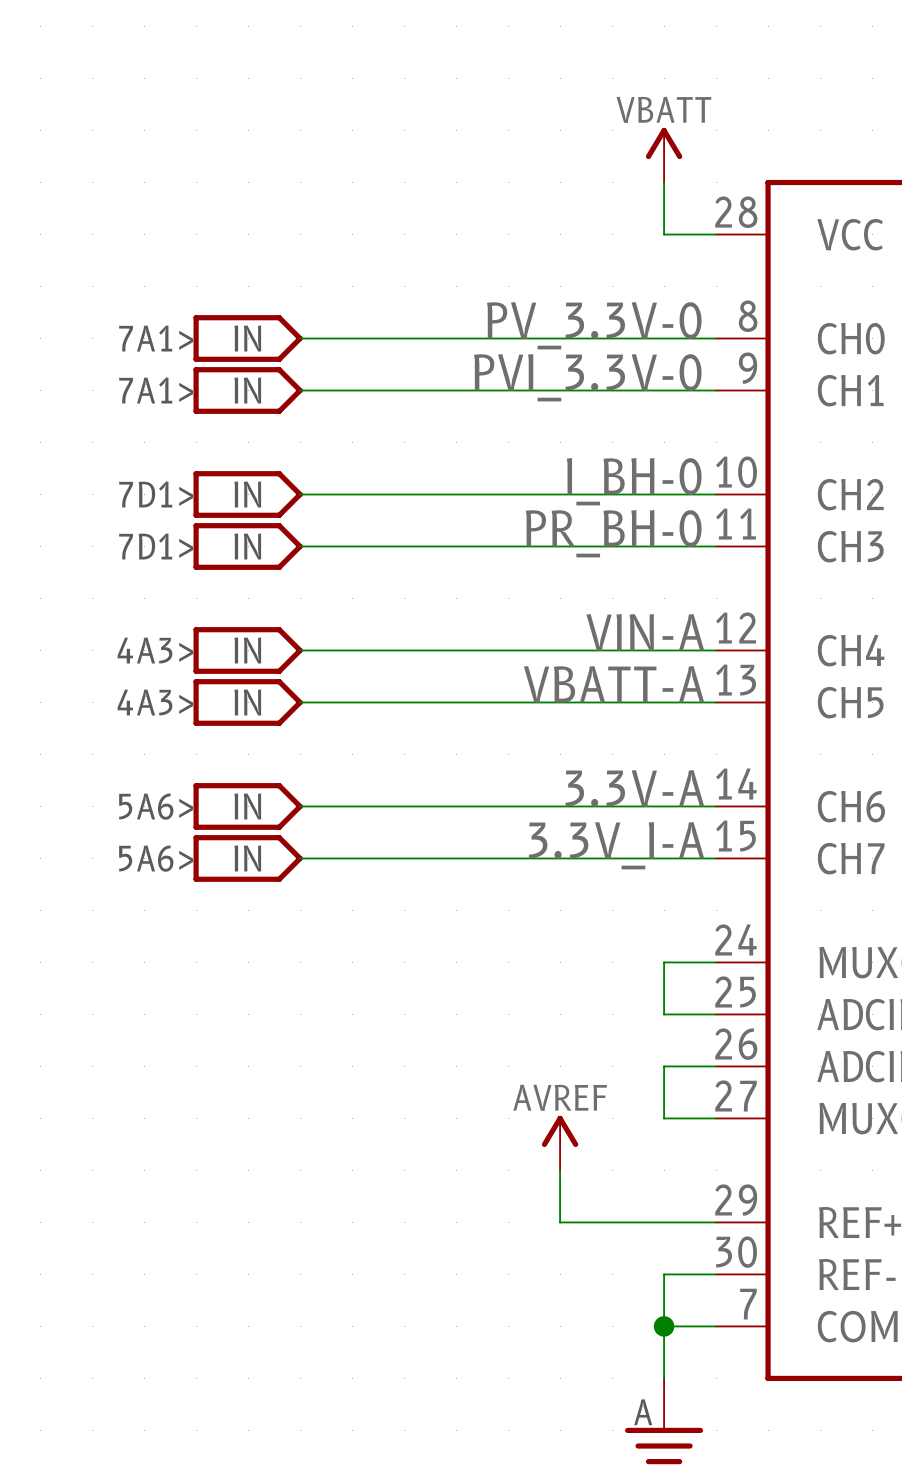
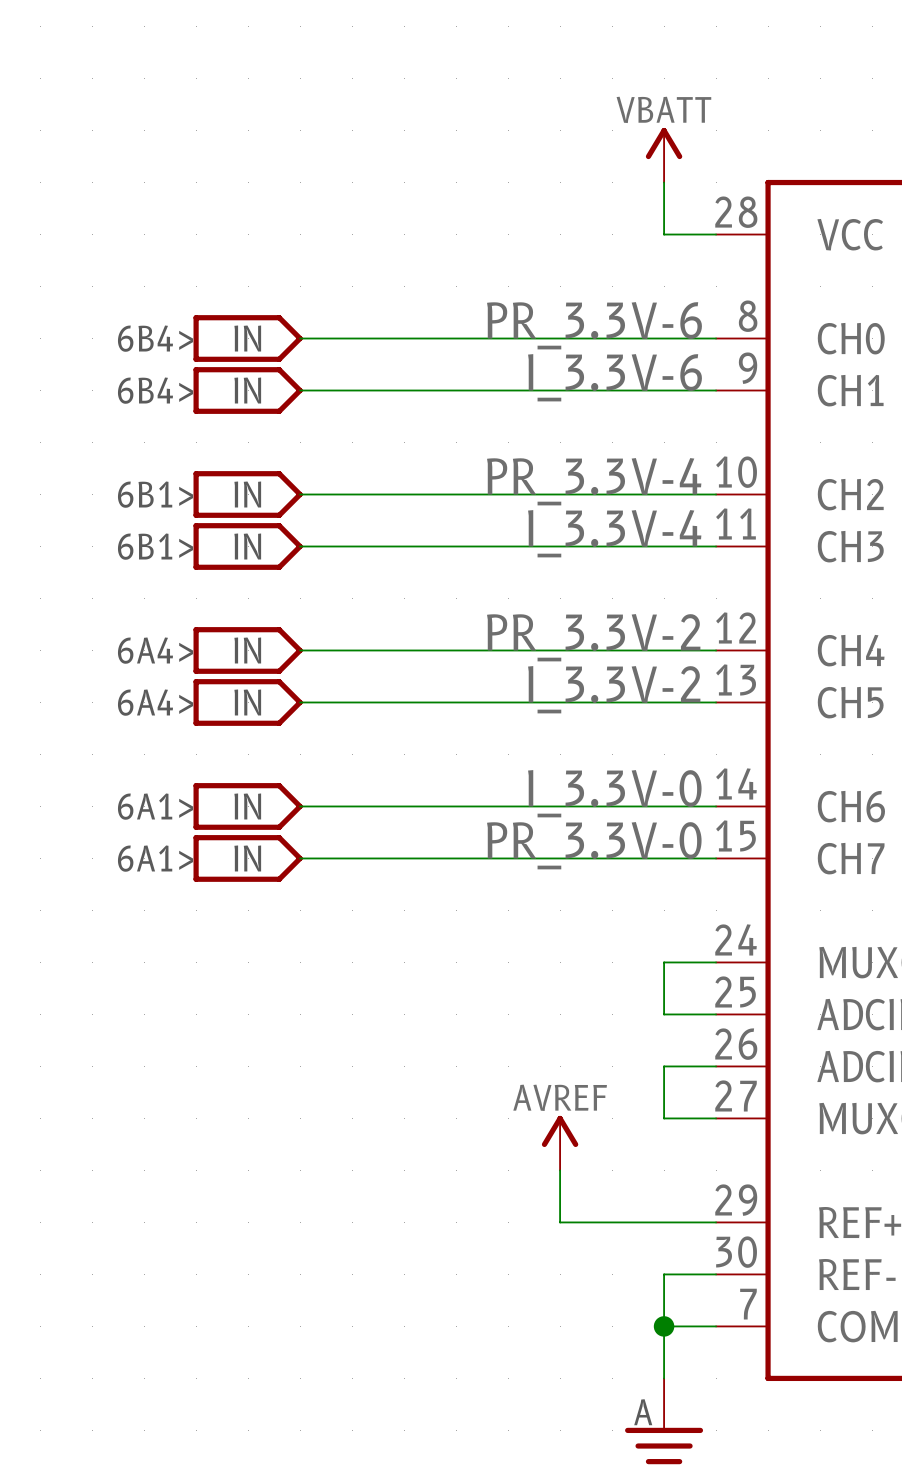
label: PV_3.3V-0 (594, 325) -> PR_3.3V-6 (594, 325)
text: 7A1> (156, 338) -> 6B4> (155, 338)
label: PVI_3.3V-0 (587, 377) -> I_3.3V-6 (615, 377)
text: 7A1> (156, 390) -> 6B4> (155, 390)
label: I_BH-0 (634, 481) -> PR_3.3V-4 (594, 481)
text: 7D1> (156, 494) -> 6B1> (155, 494)
label: PR_BH-0 (613, 533) -> I_3.3V-4 (614, 533)
text: 7D1> (156, 546) -> 6B1> (155, 546)
label: VIN-A (645, 632) -> PR_3.3V-2 (593, 637)
text: 4A3> (155, 650) -> 6A4> (155, 650)
label: VBATT-A (614, 684) -> I_3.3V-2 (614, 689)
text: 4A3> (155, 702) -> 6A4> (155, 702)
label: 3.3V-A (634, 788) -> I_3.3V-0 (614, 793)
text: 5A6> (156, 806) -> 6A1> (155, 806)
label: 3.3V_I-A (616, 845) -> PR_3.3V-0 (594, 845)
text: 5A6> (156, 858) -> 6A1> (155, 858)

